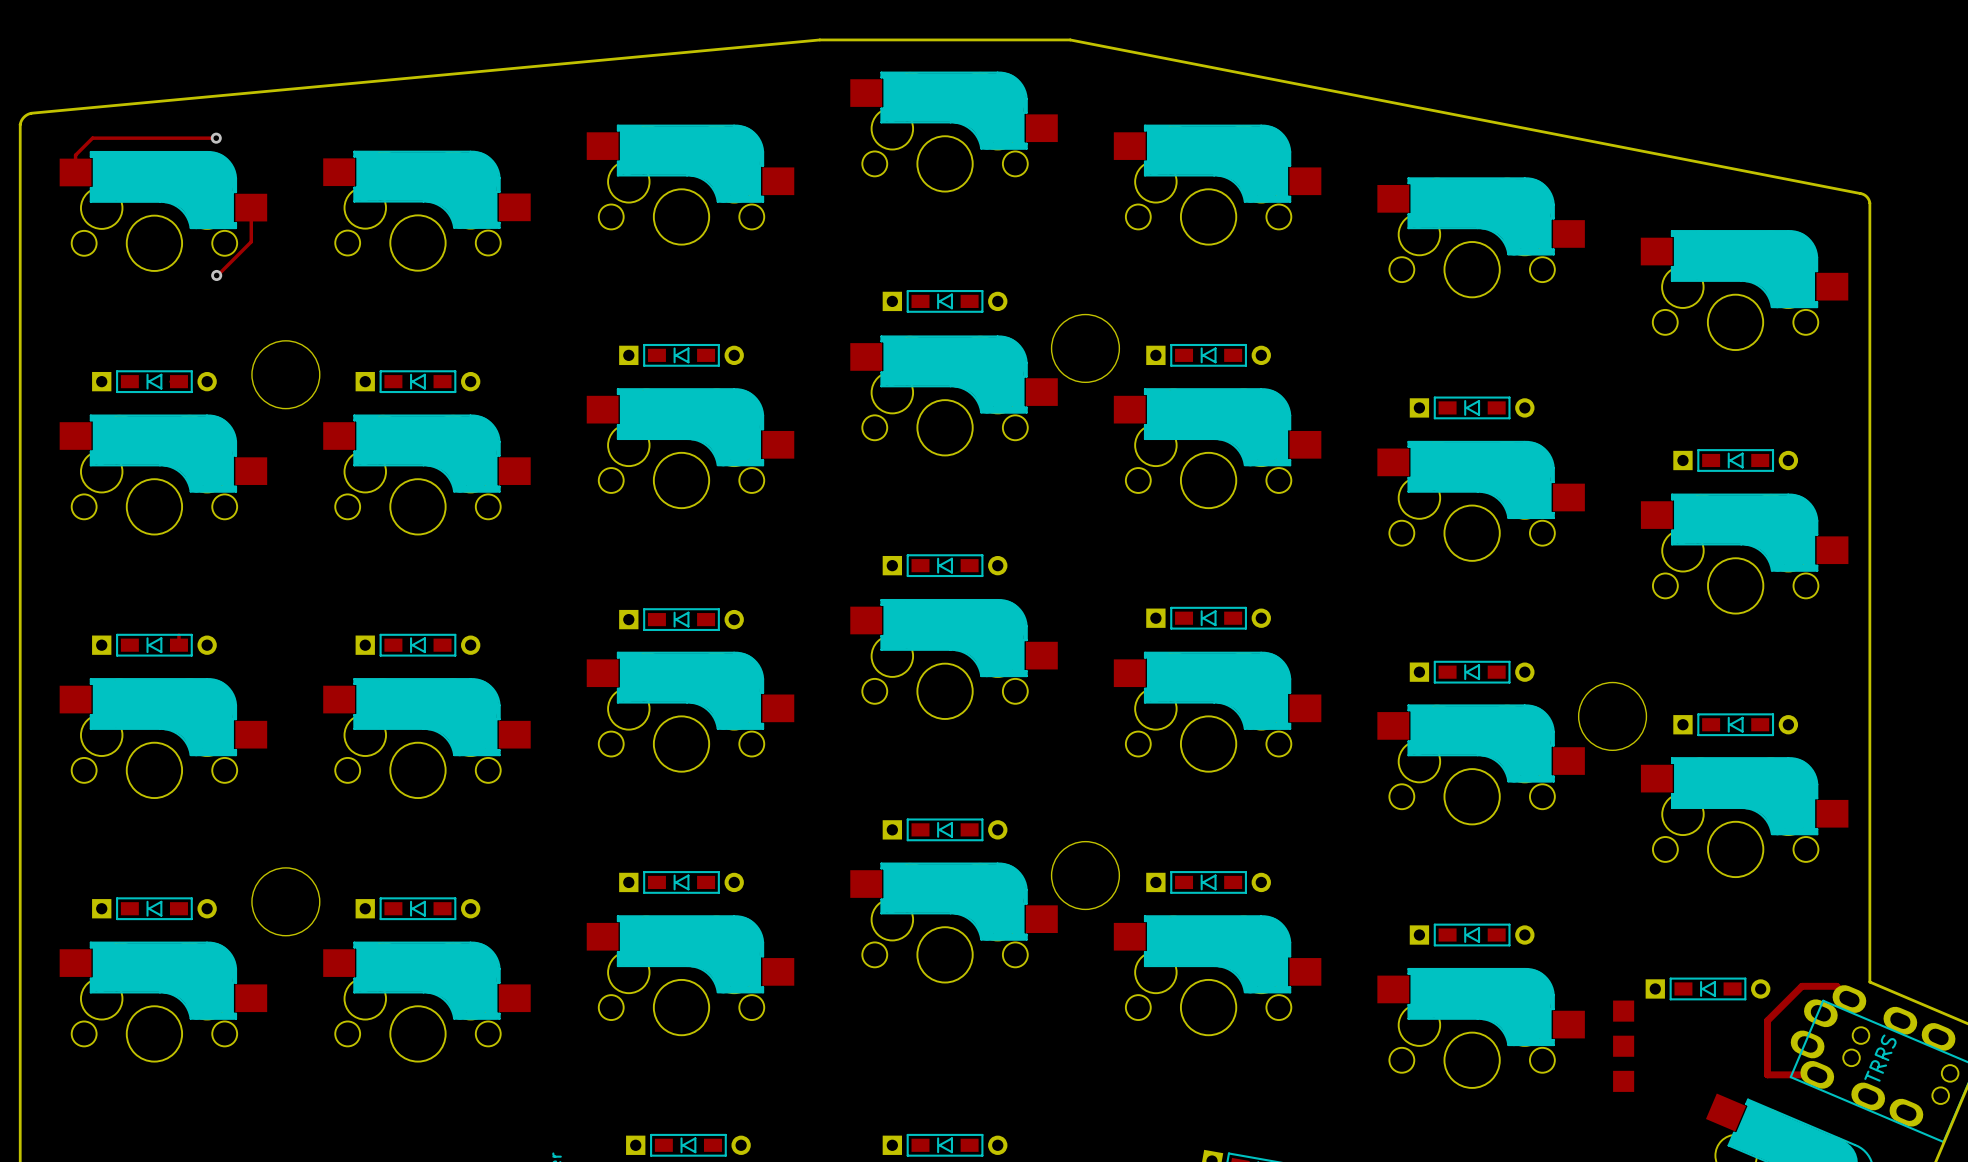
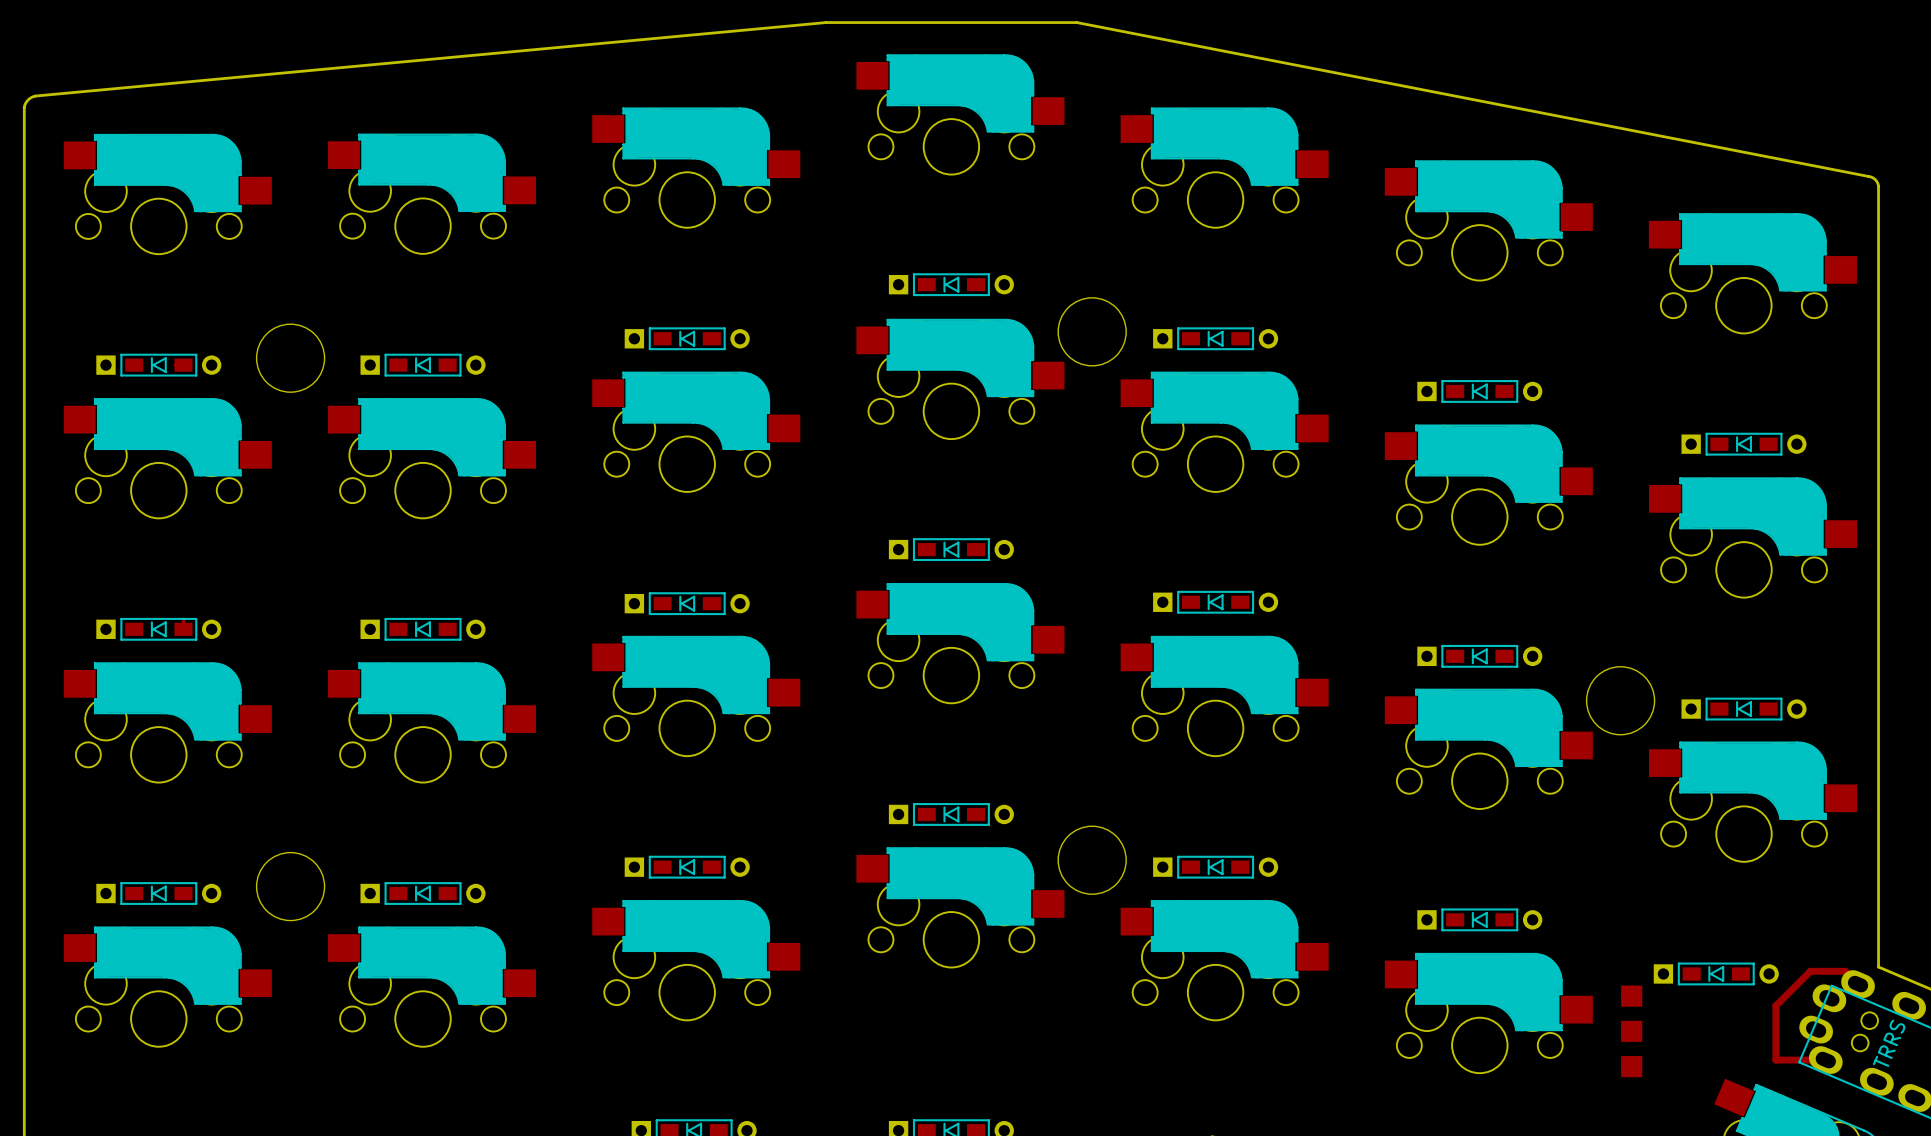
track: (216, 138) (92, 138) (75, 155) (75, 172) -> none
via: (216, 138) -> none
track: (251, 207) (251, 241) (216, 275) -> none
via: (216, 275) -> none

